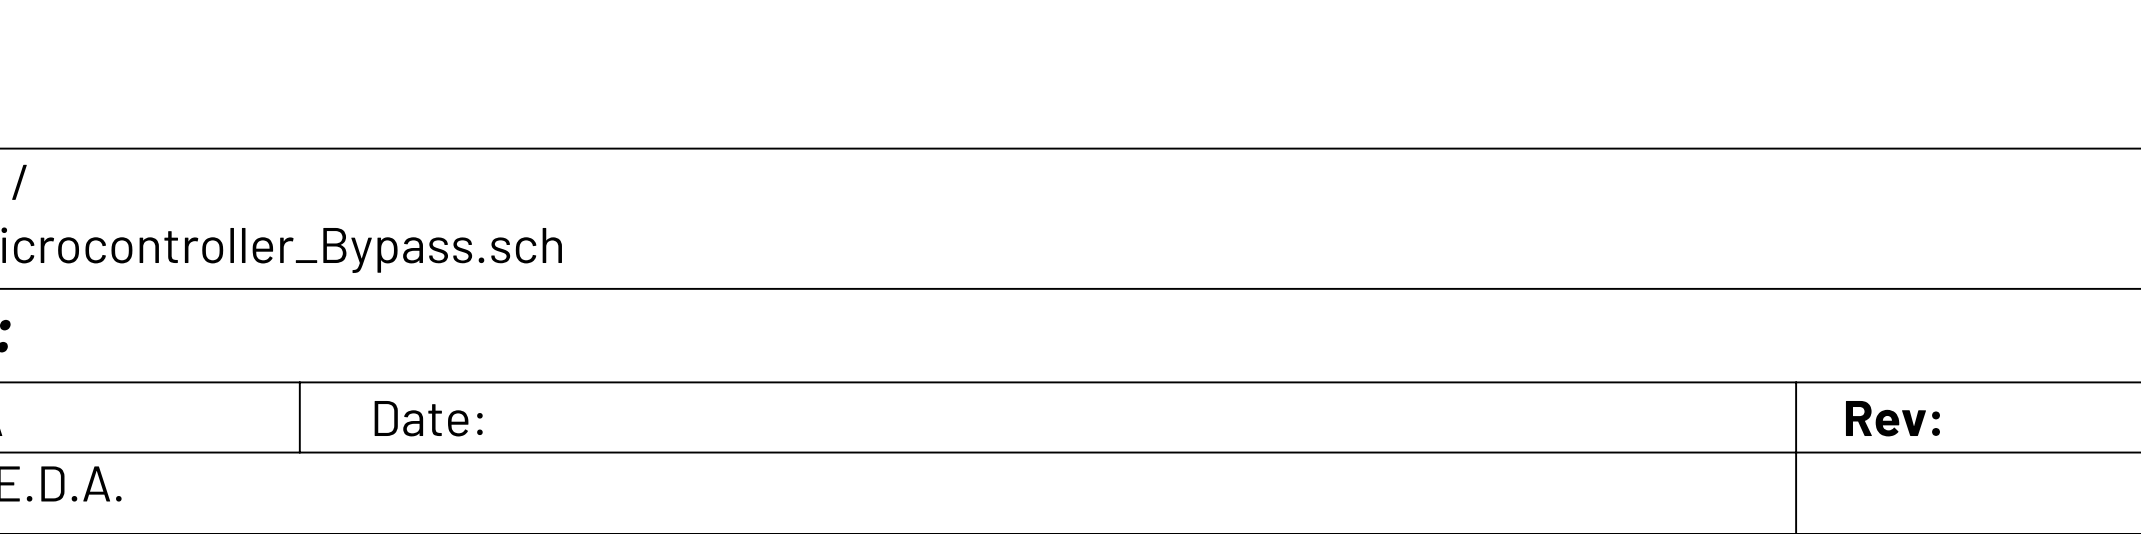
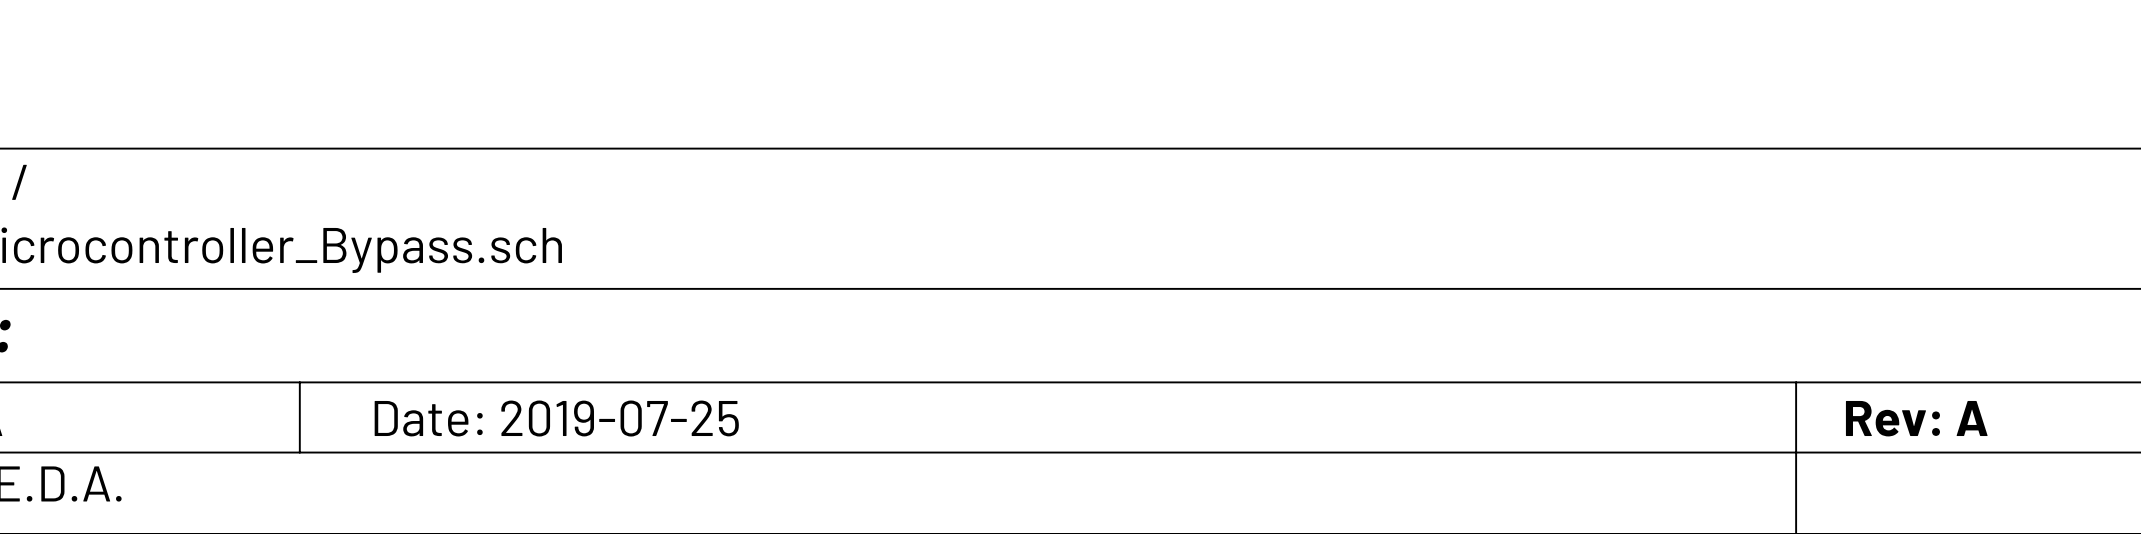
title block: Date: (428, 418) -> Date: 2019-07-25 (556, 418)
title block: Rev: (1892, 418) -> Rev: A (1916, 418)

